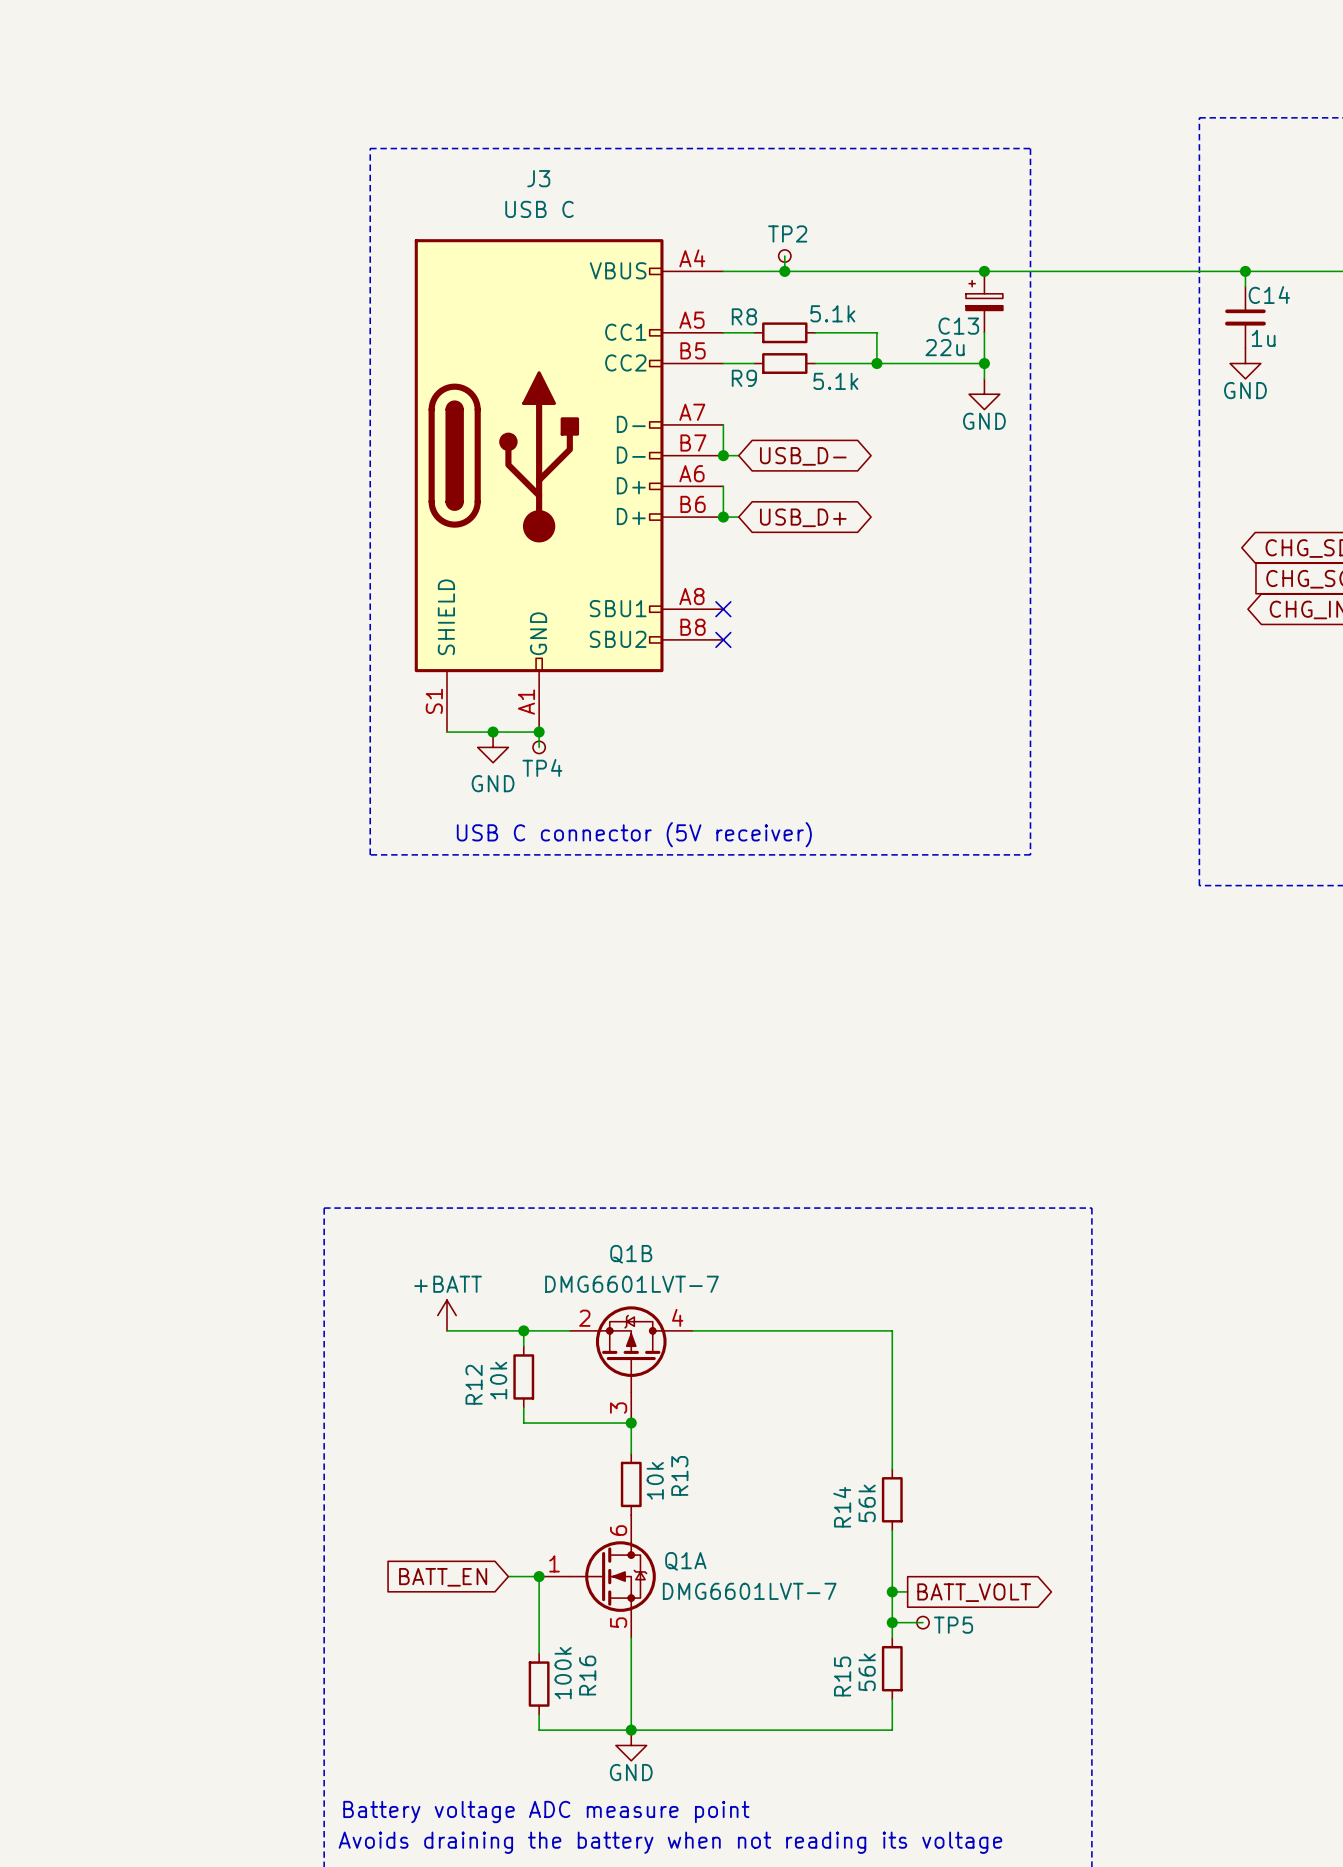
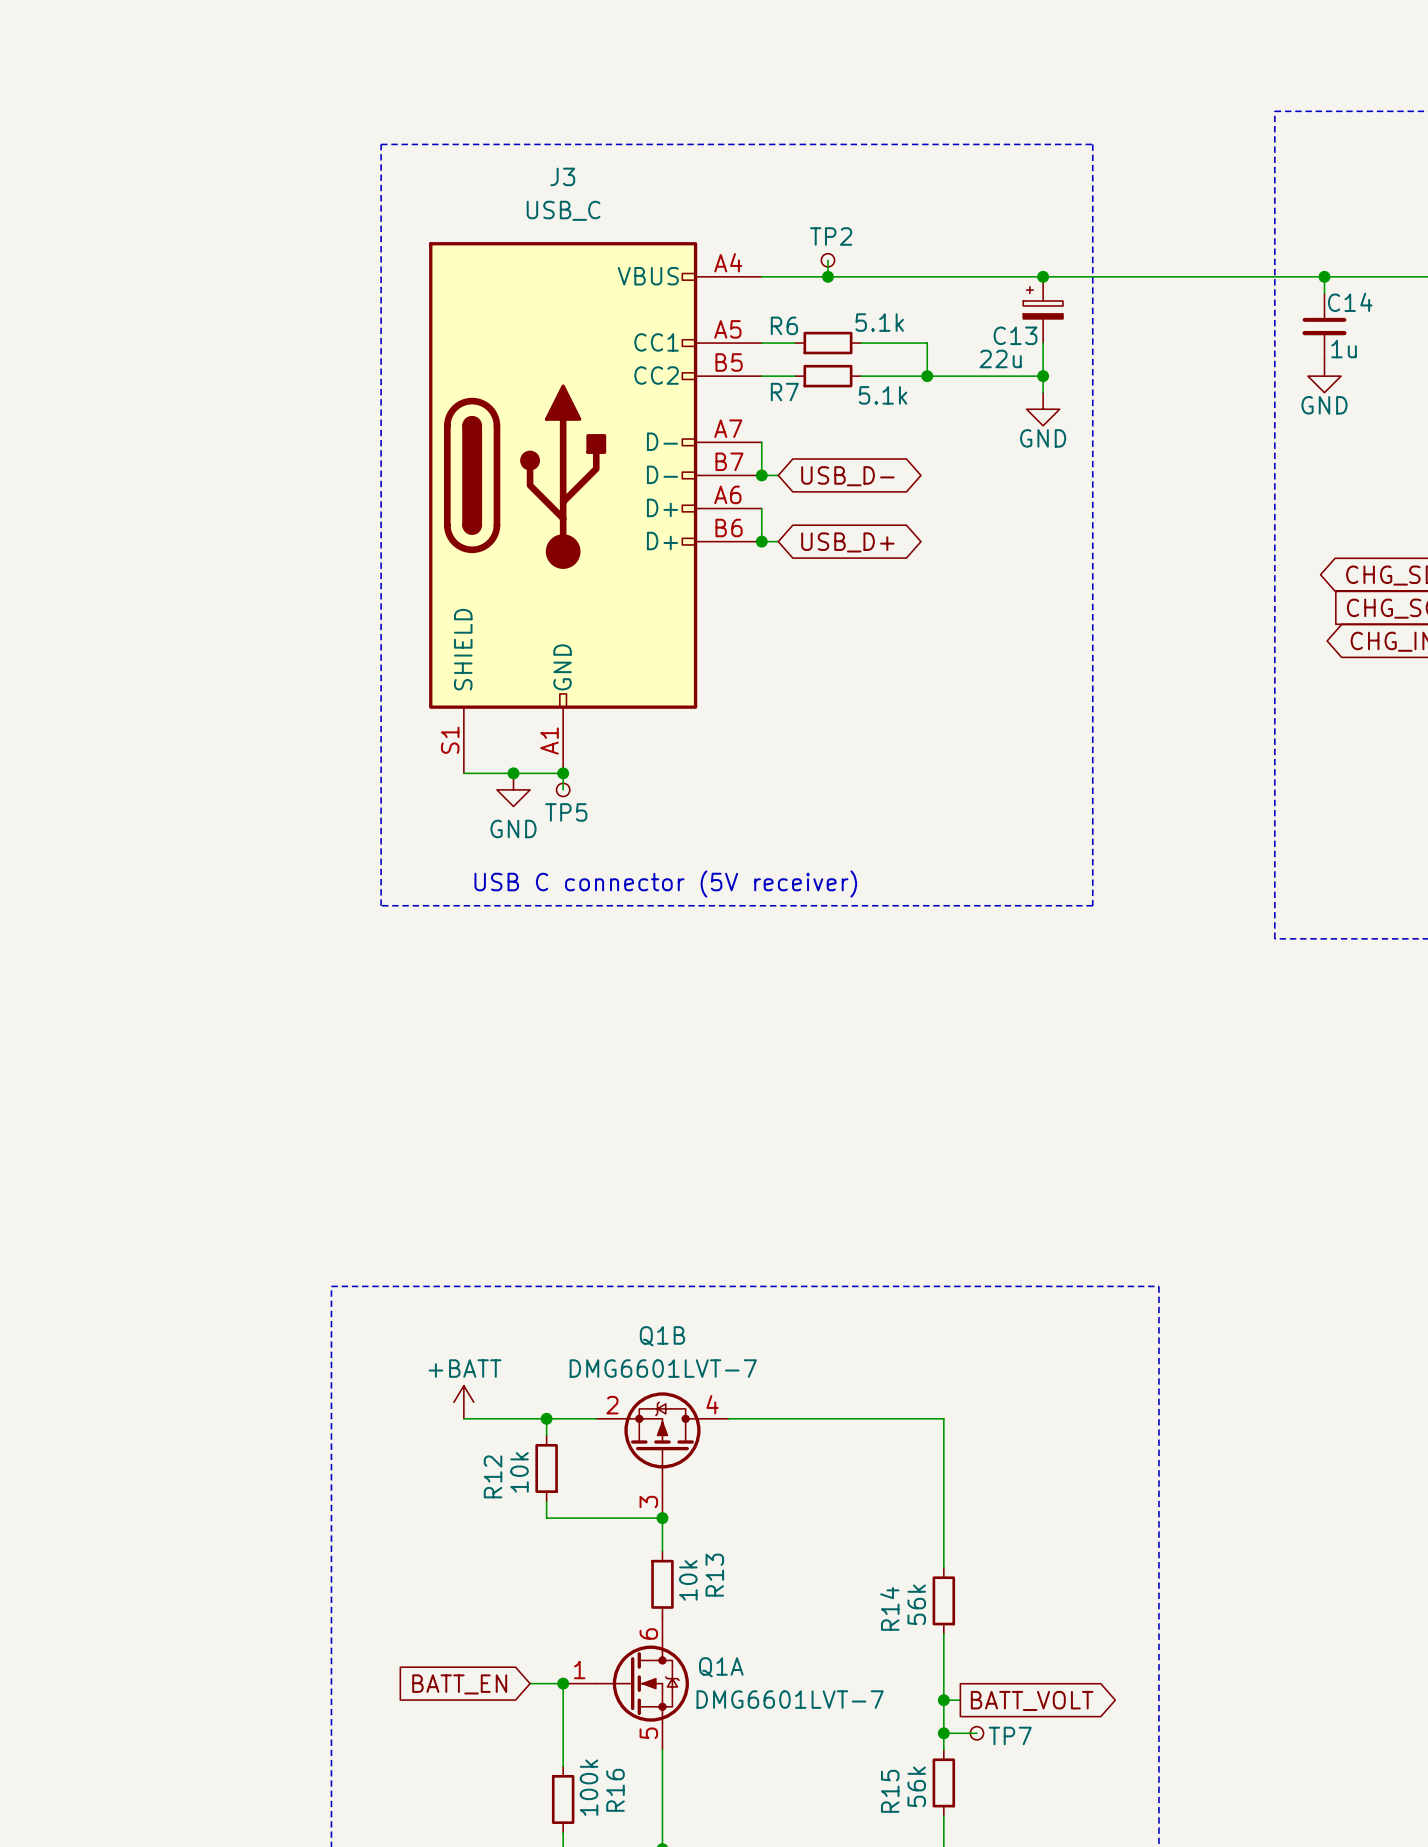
J3 value: USB C (539, 209) -> USB_C (563, 210)
J3 symbol: [414, 239, 724, 733] -> [429, 242, 762, 774]
R8 name: R8 (744, 316) -> R6 (784, 325)
R9 name: R9 (744, 378) -> R7 (784, 392)
no-connect mark: (723, 609) -> none
no-connect mark: (723, 639) -> none
TP4 name: TP4 (542, 767) -> TP5 (566, 812)
TP5 name: TP5 (953, 1625) -> TP7 (1010, 1735)

